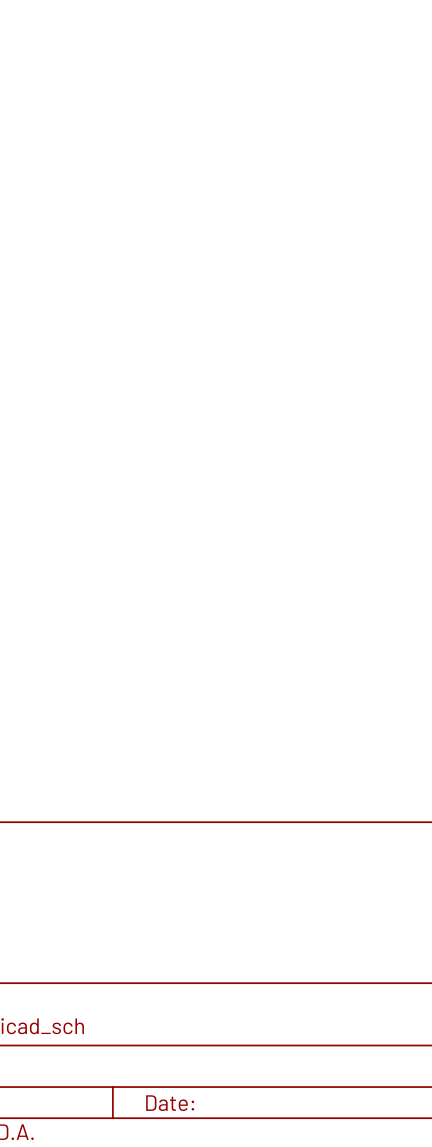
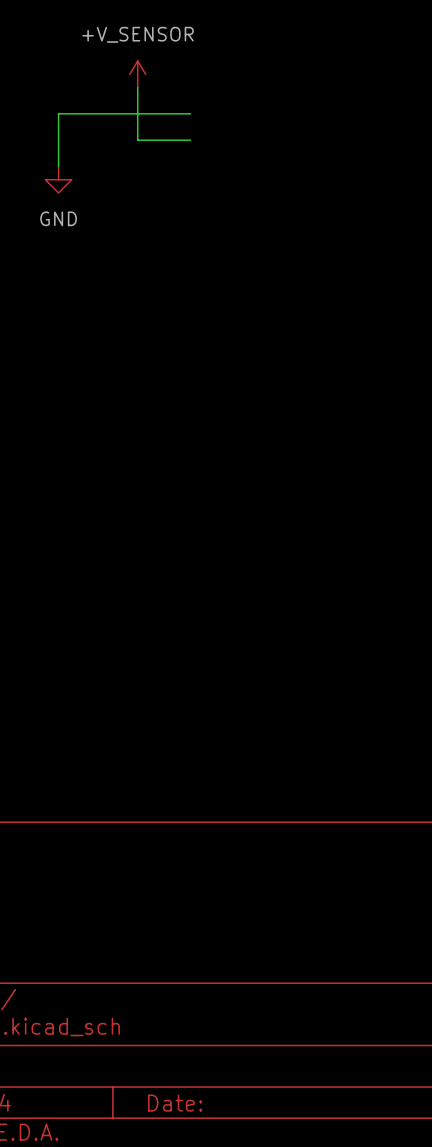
power symbol: none -> +V_SENSOR (137, 74)
wire: none -> (137, 87) (137, 140) (190, 140)
wire: none -> (190, 113) (58, 113) (58, 166)
power symbol: none -> GND (58, 179)

